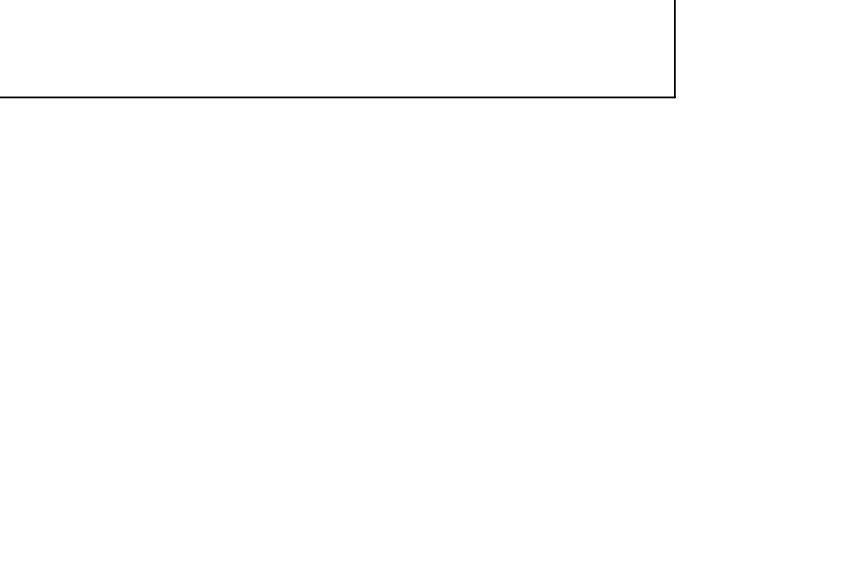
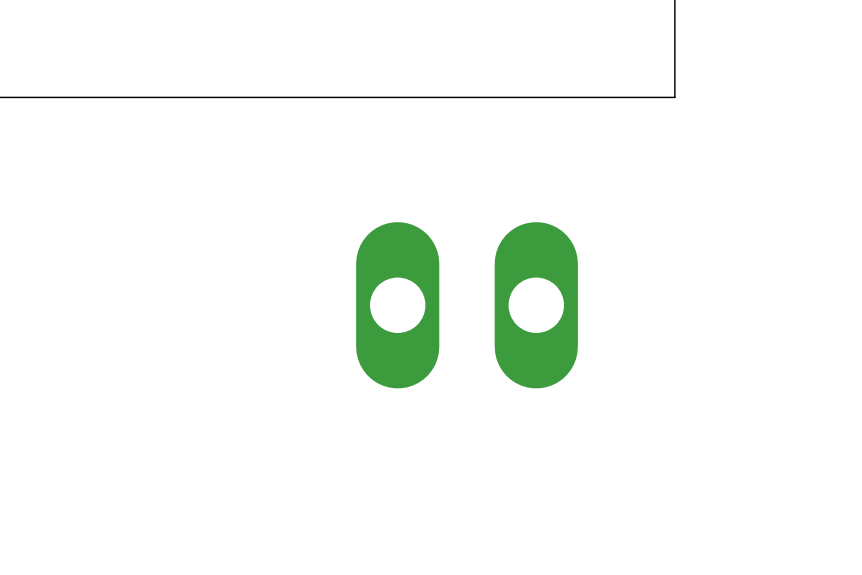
part: none -> (467, 305)

